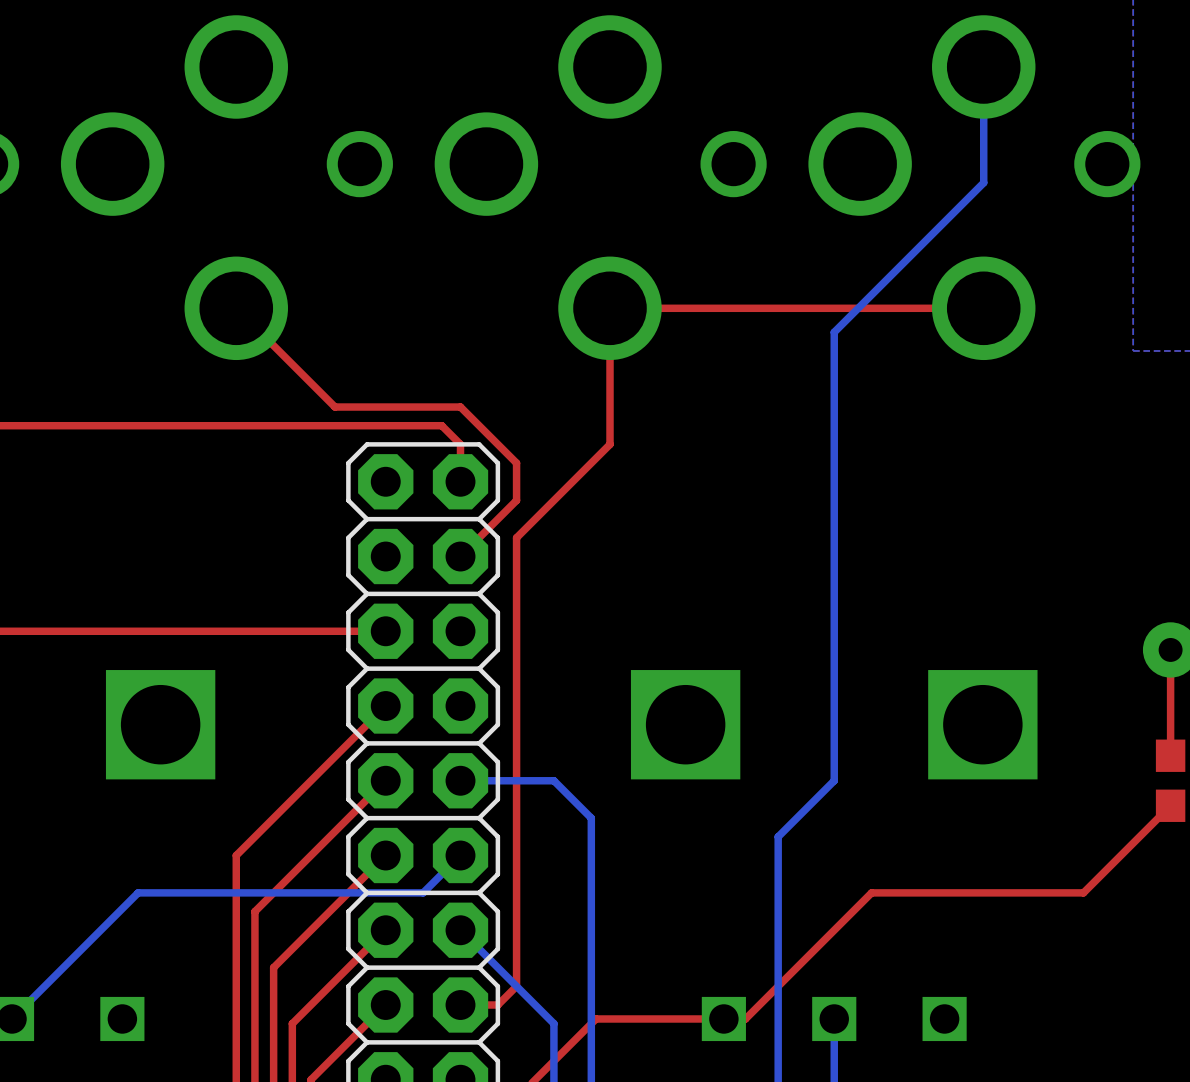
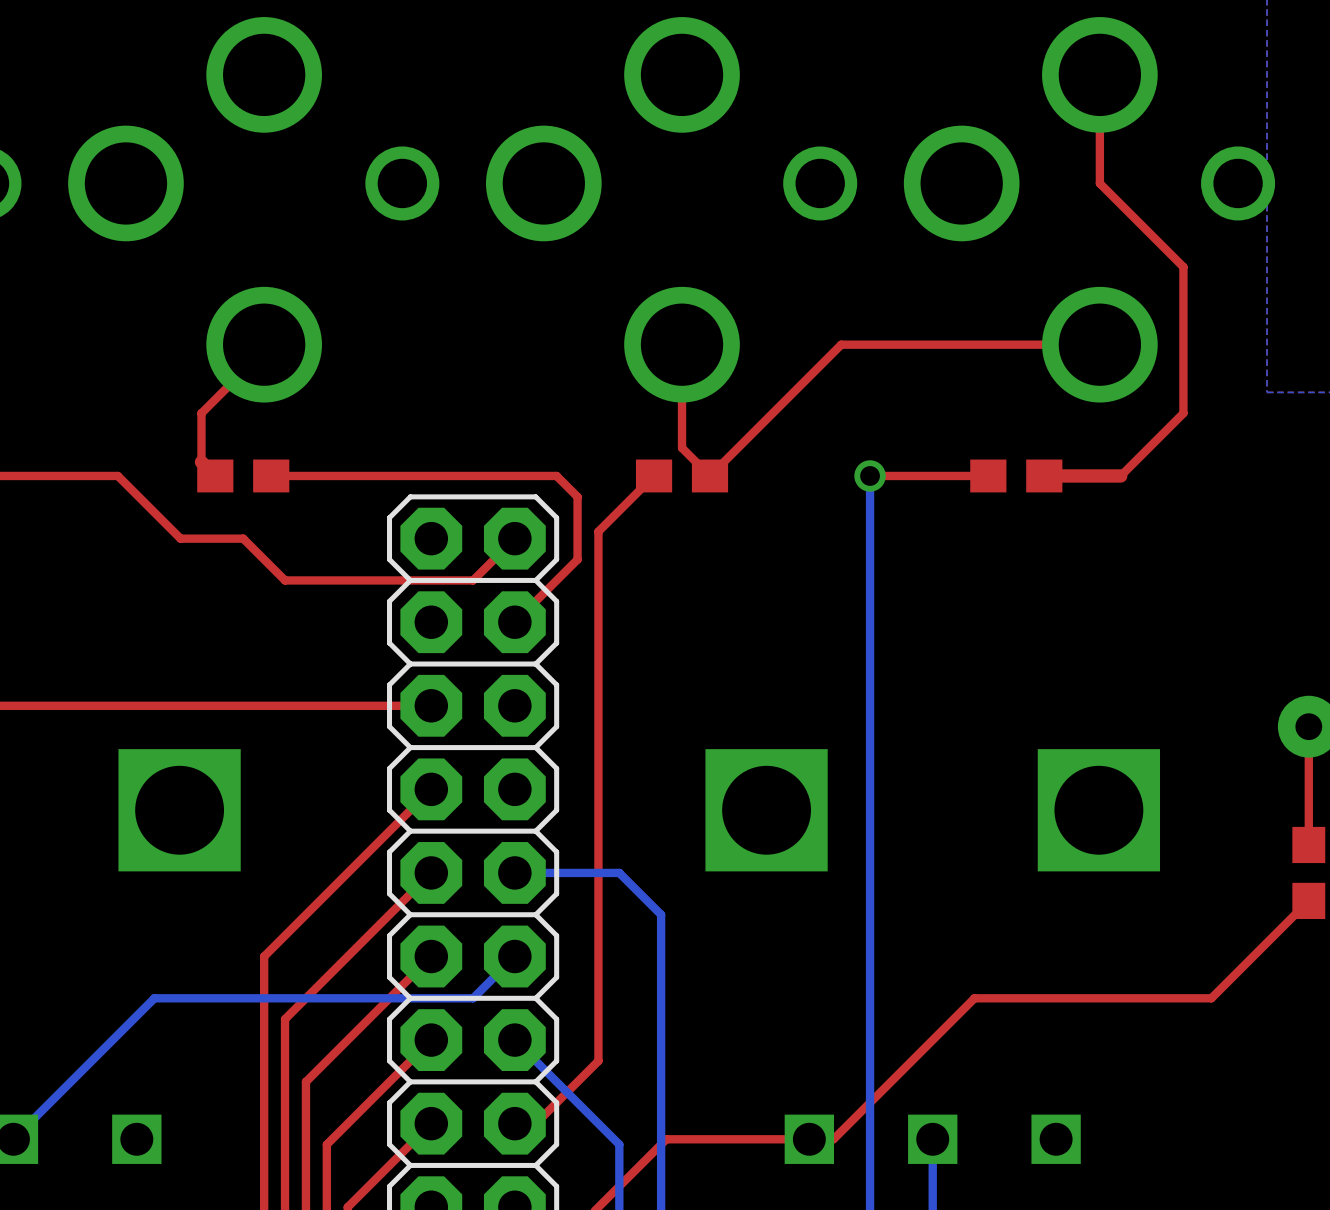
top track: none -> (1099, 74) (1099, 183) (1183, 267) (1183, 413) (1120, 475) (1044, 475)
bottom track: (983, 66) (983, 182) (834, 332) (834, 780) (778, 836) -> (870, 475) (870, 935)
top track: (236, 308) (334, 407) (460, 407) (516, 463) -> (264, 344) (264, 350) (201, 413) (201, 462) (215, 475)
top track: (752, 308) (610, 308) -> (841, 344) (709, 475) (682, 448)
top track: (610, 400) (610, 444) (516, 537) (516, 986) (497, 1005) (479, 1005) -> (654, 475) (598, 531) (598, 1060) (535, 1123)
part: none -> (243, 475)
top track: (242, 425) (105, 425) -> (514, 538) (473, 580) (285, 580) (243, 538) (180, 538) (117, 475)
top track: (441, 425) (460, 444) (460, 481) -> (493, 475) (556, 475) (577, 496) (577, 517)
part: none -> (682, 475)
via: none -> (870, 475)
top track: none -> (988, 475) (870, 475)
part: none -> (1016, 475)

